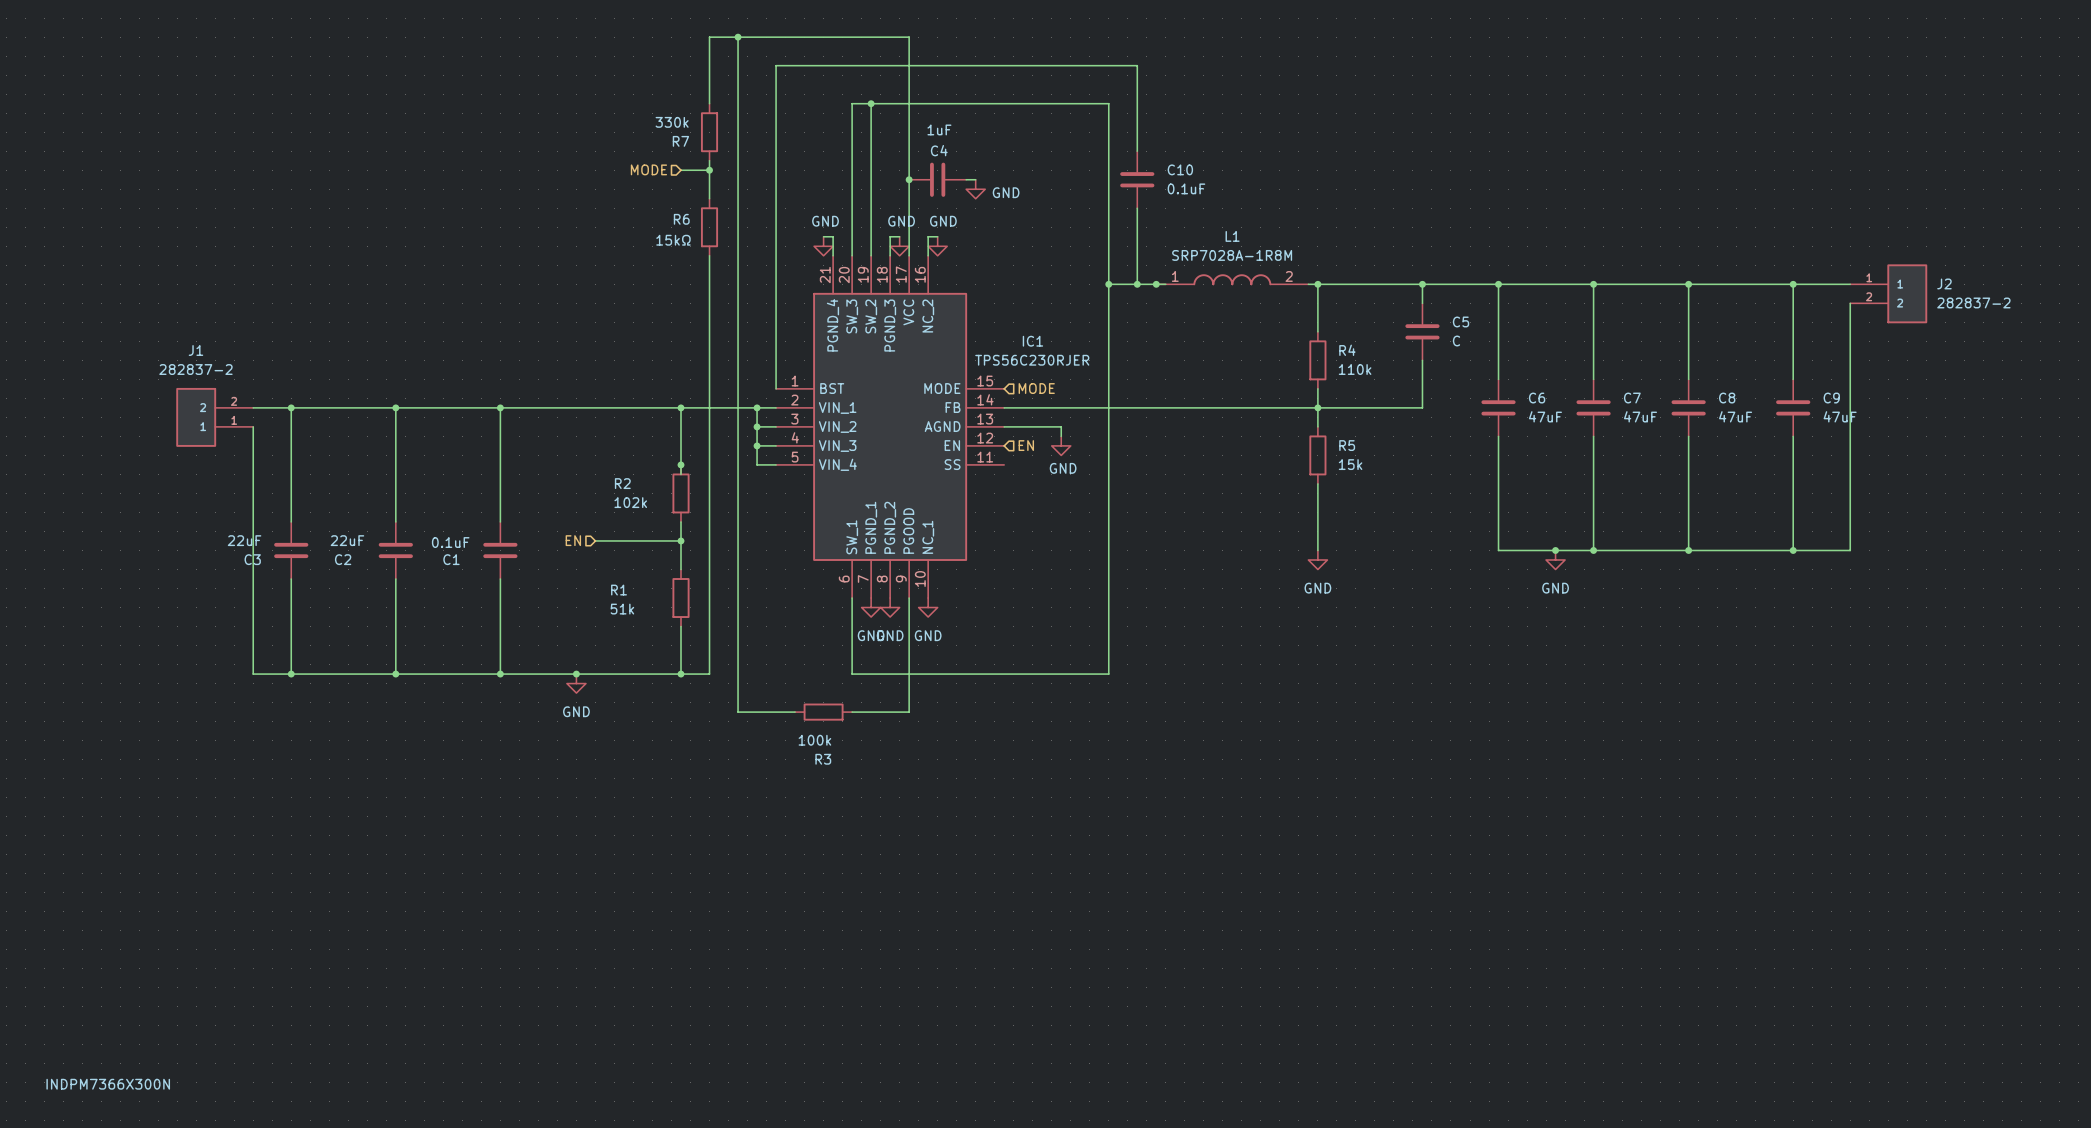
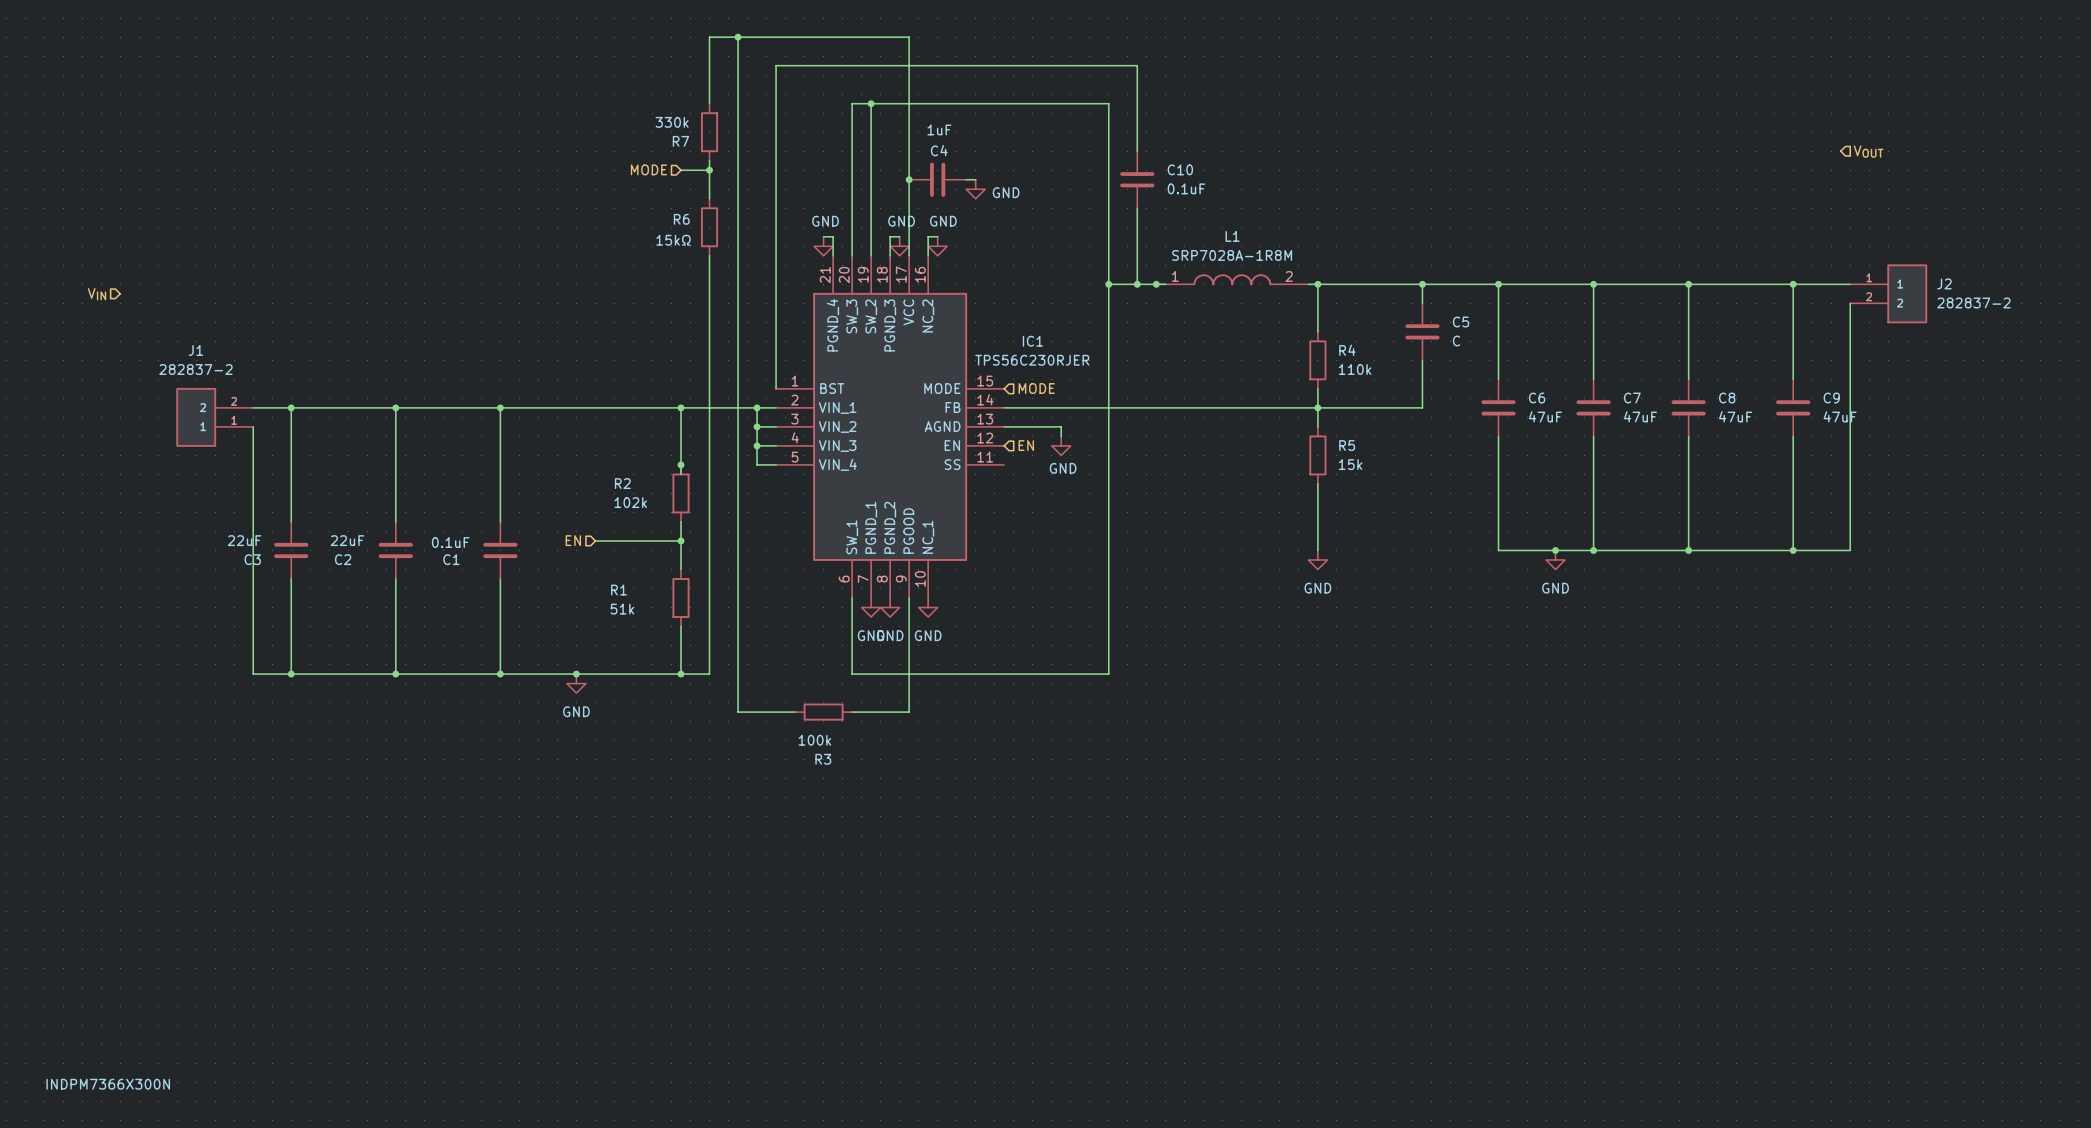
hierarchical label: none -> VOUT (1868, 151)
hierarchical label: none -> VIN (97, 294)

